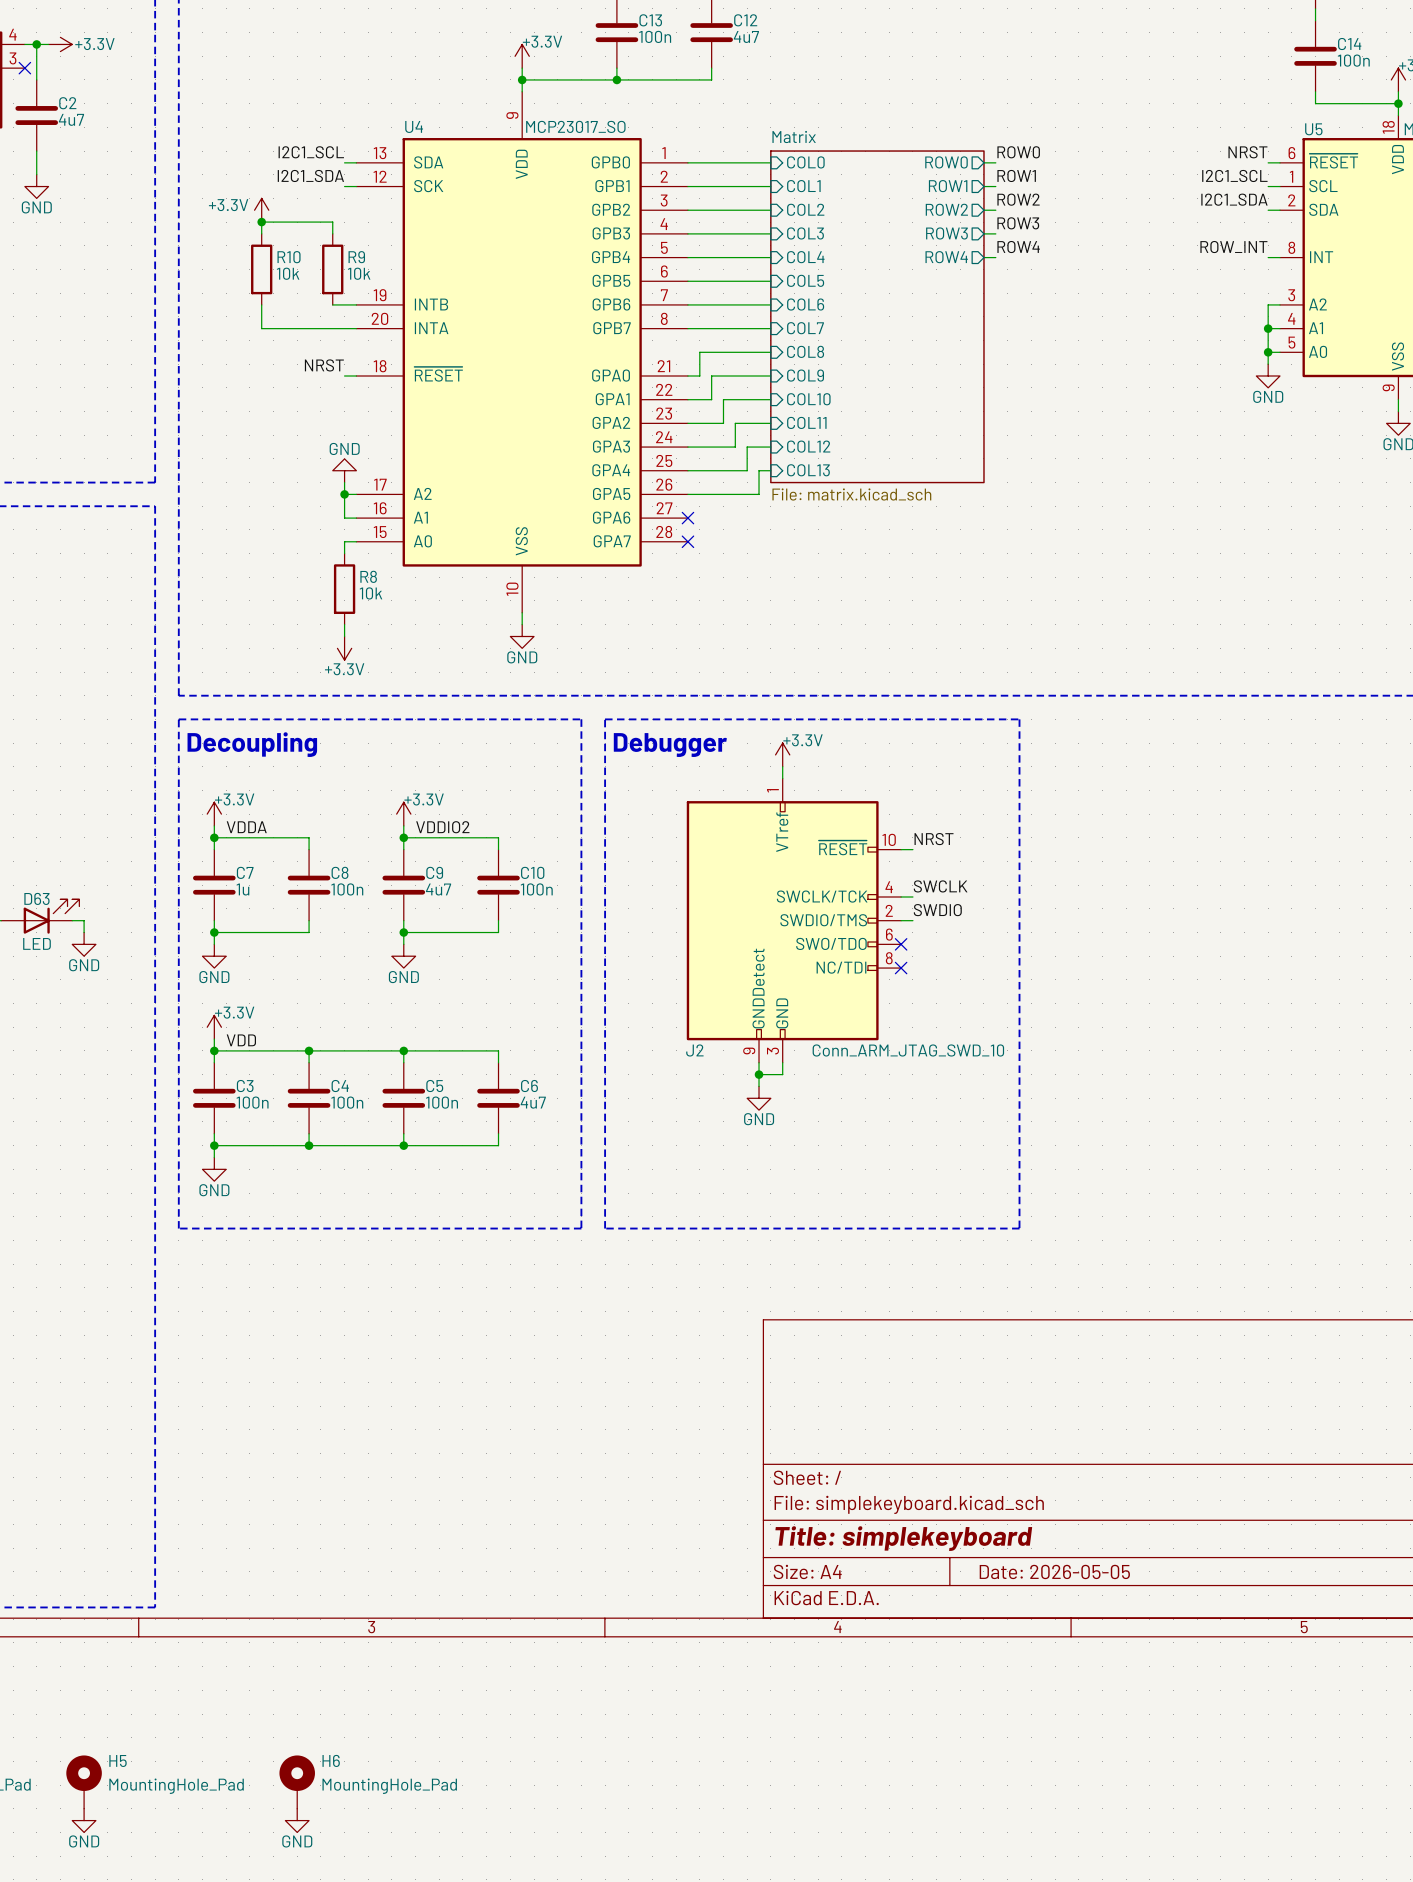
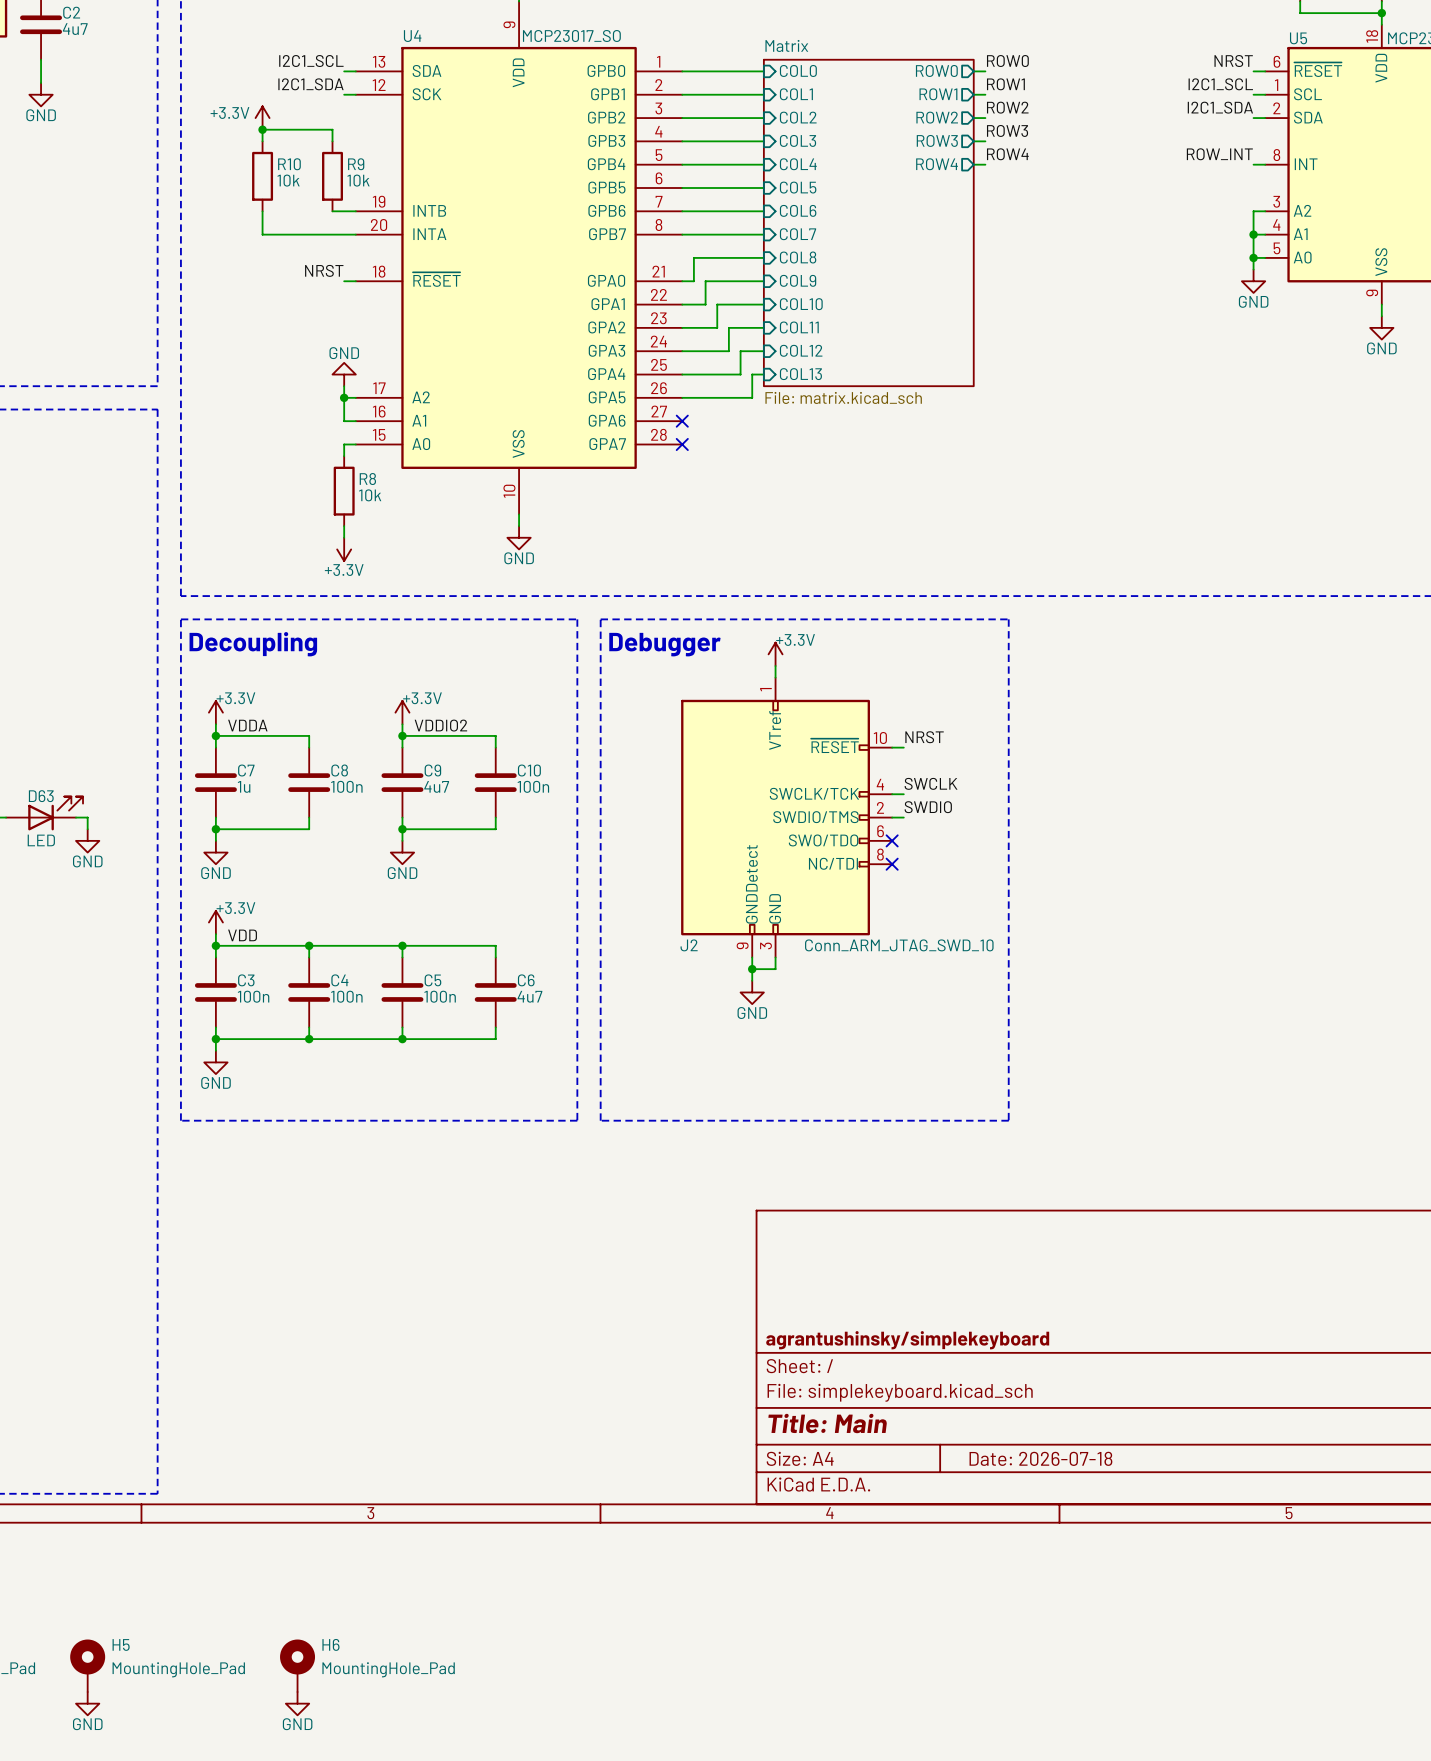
title block: none -> agrantushinsky/simplekeyboard (907, 1340)
title block: Title: simplekeyboard (903, 1538) -> Title: Main (827, 1423)
title block: Date: 2026-05-05 (1054, 1571) -> Date: 2026-07-18 (1040, 1458)

